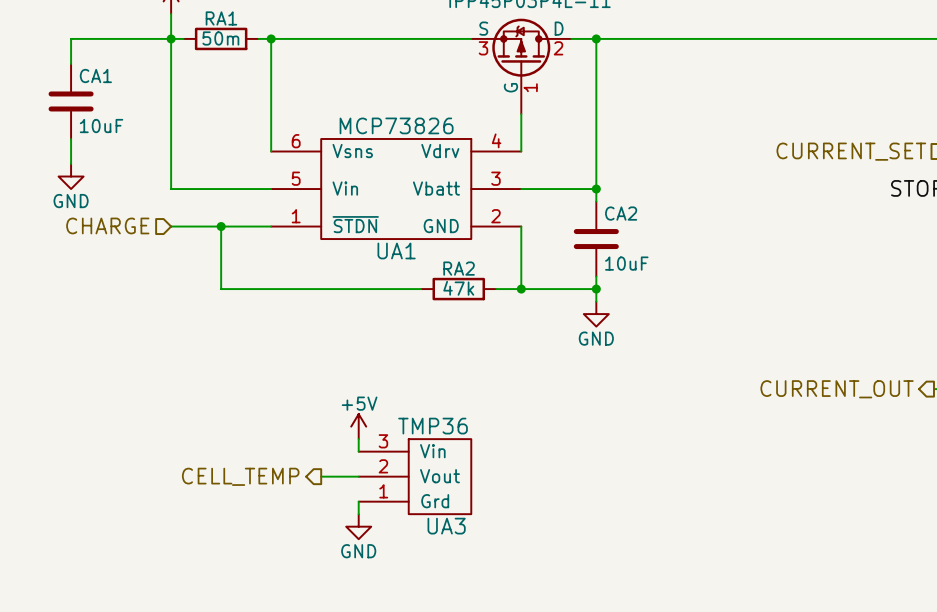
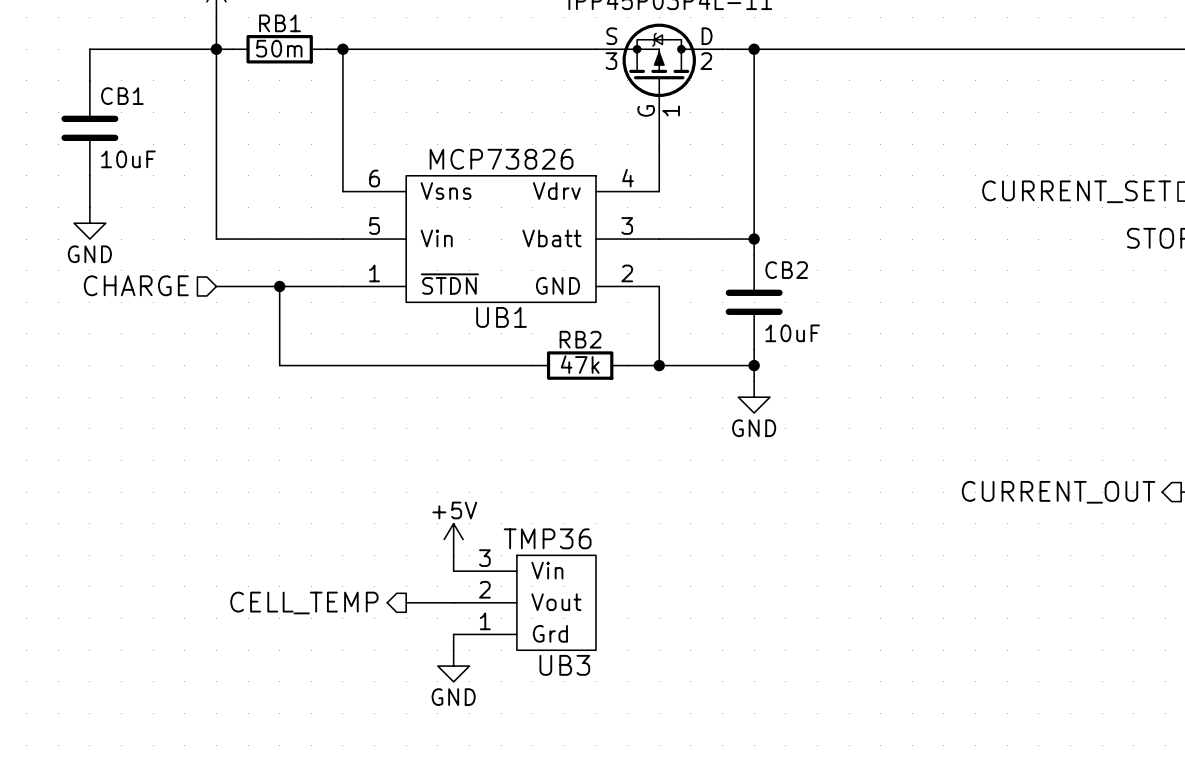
RA1 name: RA1 (221, 18) -> RB1 (280, 23)
CA1 name: CA1 (95, 76) -> CB1 (122, 96)
CA2 name: CA2 (621, 213) -> CB2 (786, 270)
UA1 name: UA1 (396, 250) -> UB1 (501, 317)
RA2 name: RA2 (459, 268) -> RB2 (580, 339)
UA3 name: UA3 (446, 526) -> UB3 (564, 665)

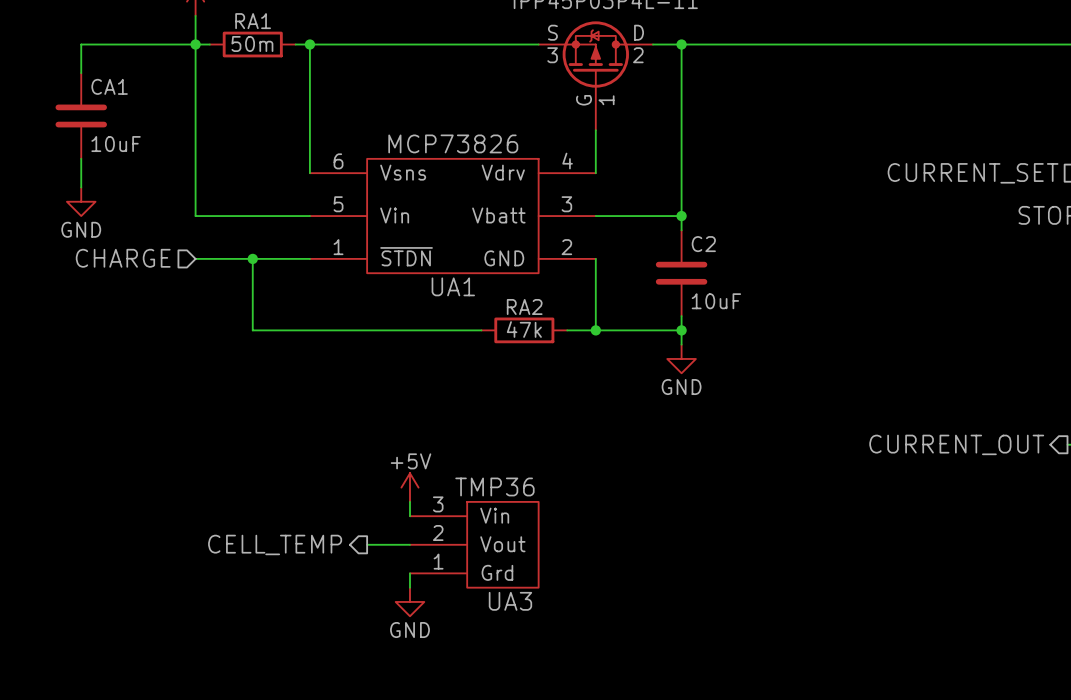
RB1 name: RB1 (280, 23) -> RA1 (253, 21)
CB1 name: CB1 (122, 96) -> CA1 (109, 86)
CB2 name: CB2 (786, 270) -> C2 (703, 244)
UB1 name: UB1 (501, 317) -> UA1 (453, 286)
RB2 name: RB2 (580, 339) -> RA2 (524, 306)
UB3 name: UB3 (564, 665) -> UA3 (510, 601)

